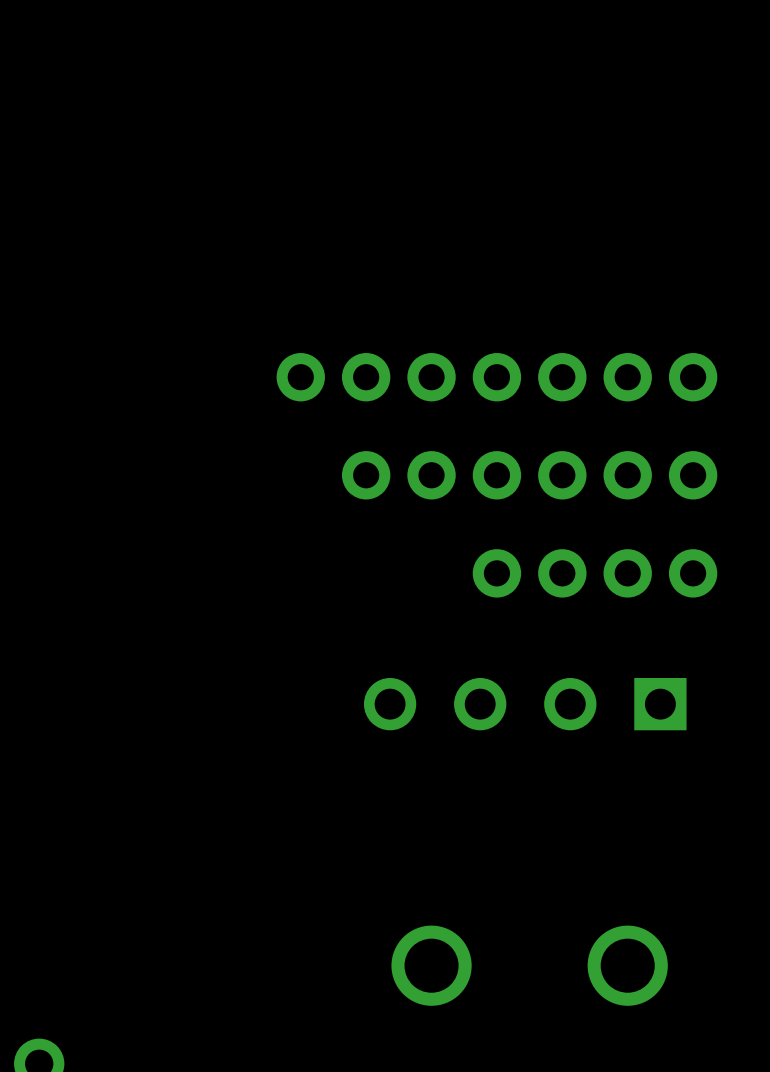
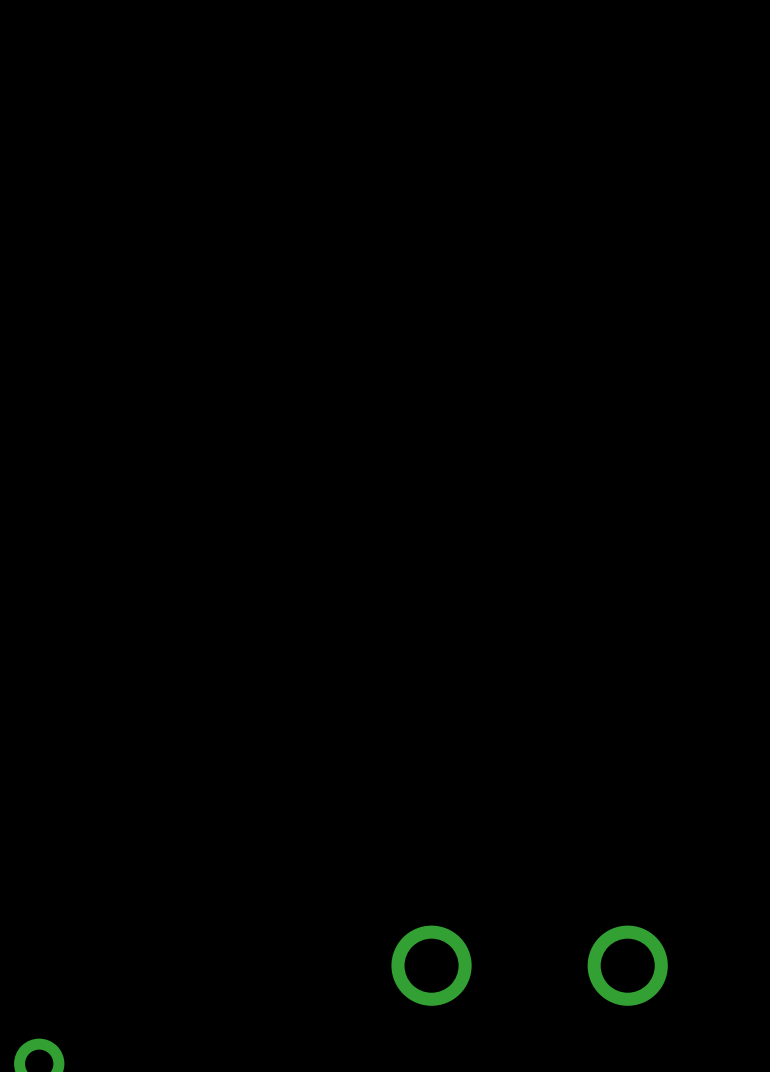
part: (496, 377) -> none
part: (529, 475) -> none
part: (595, 573) -> none
part: (525, 704) -> none

